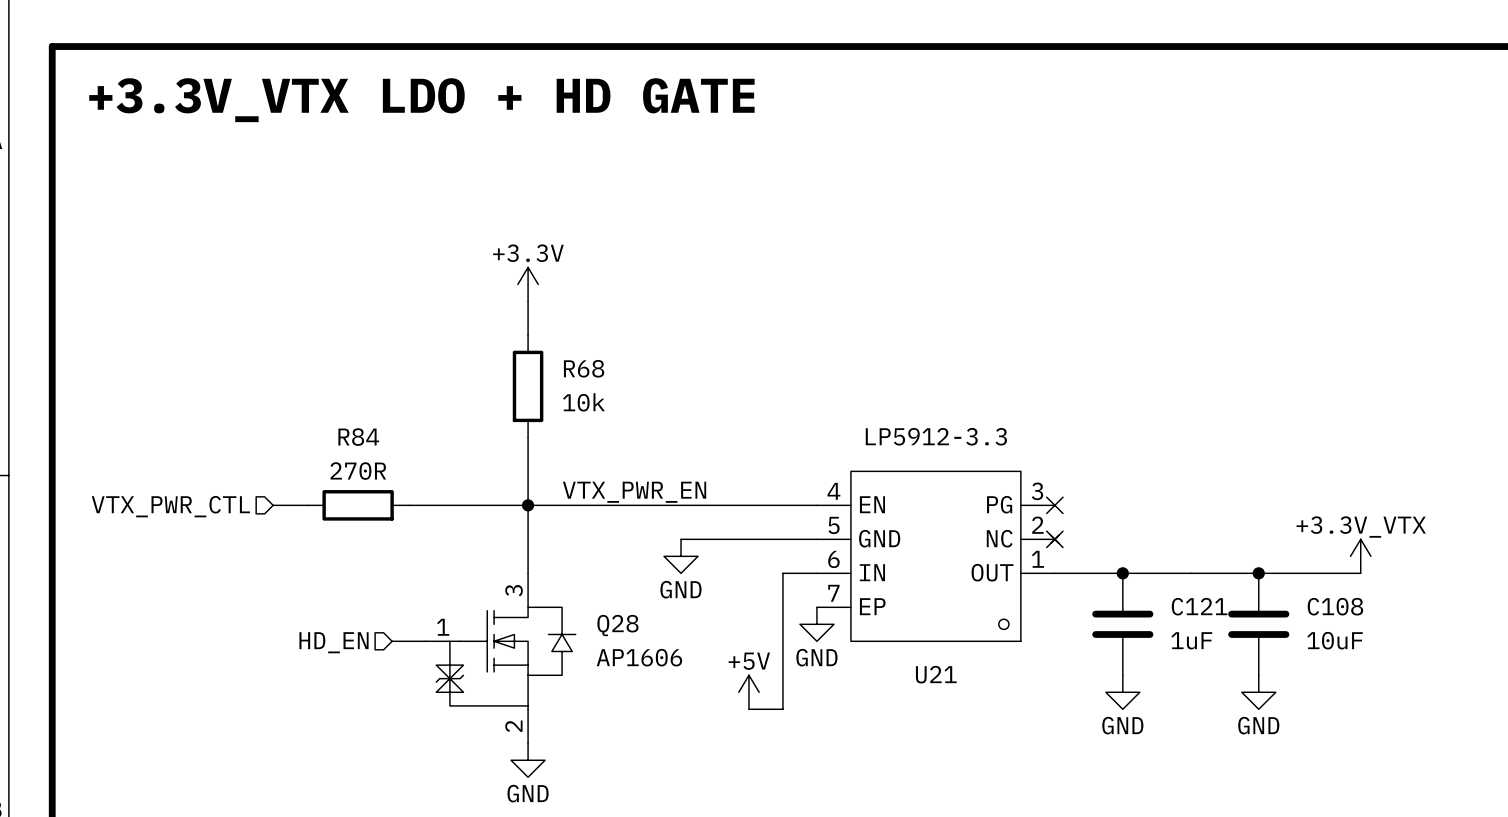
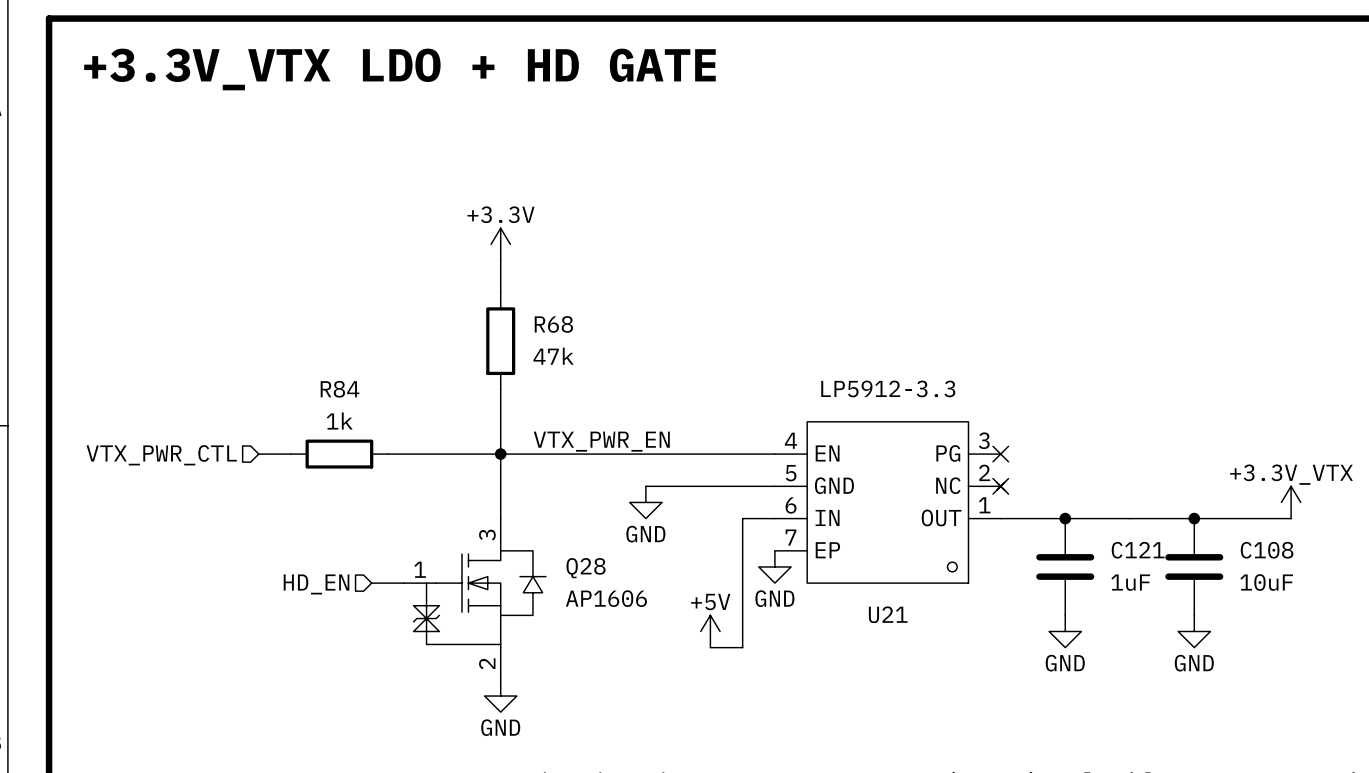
R68 value: 10k (583, 402) -> 47k (553, 356)
R84 value: 270R (358, 471) -> 1k (339, 421)

